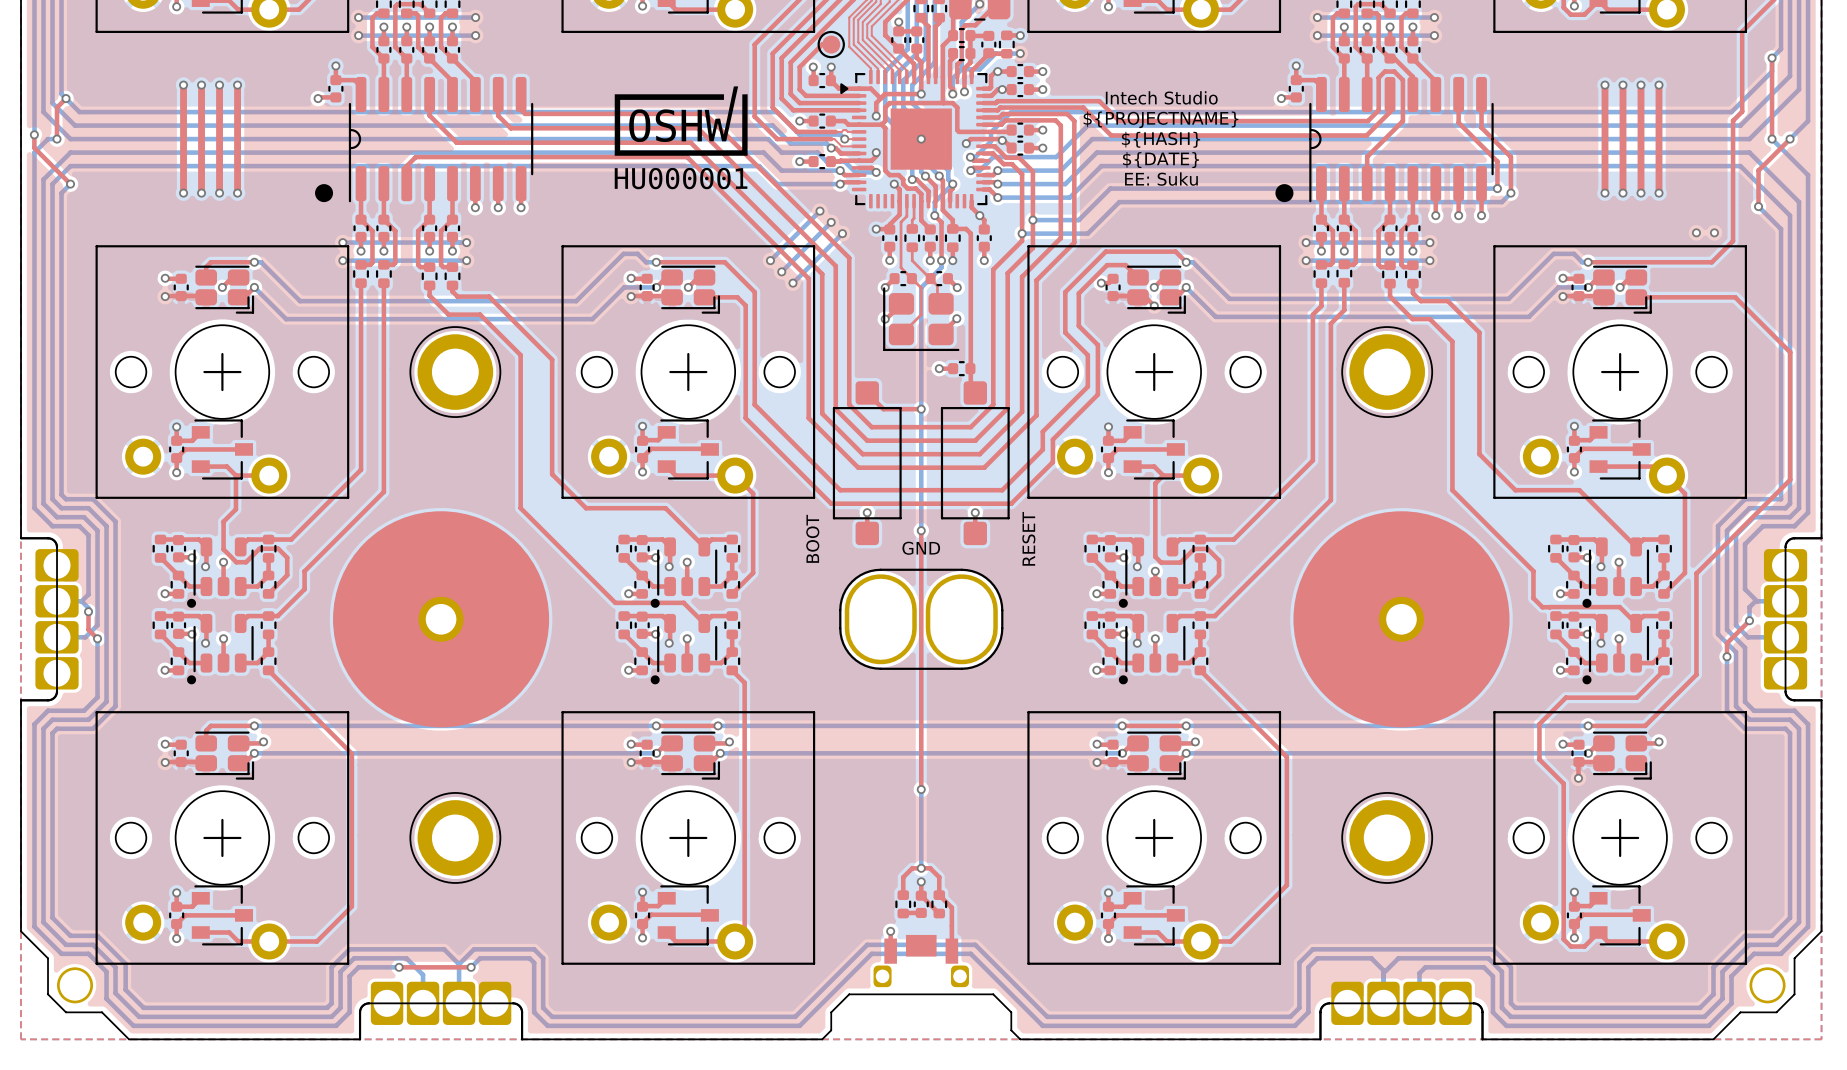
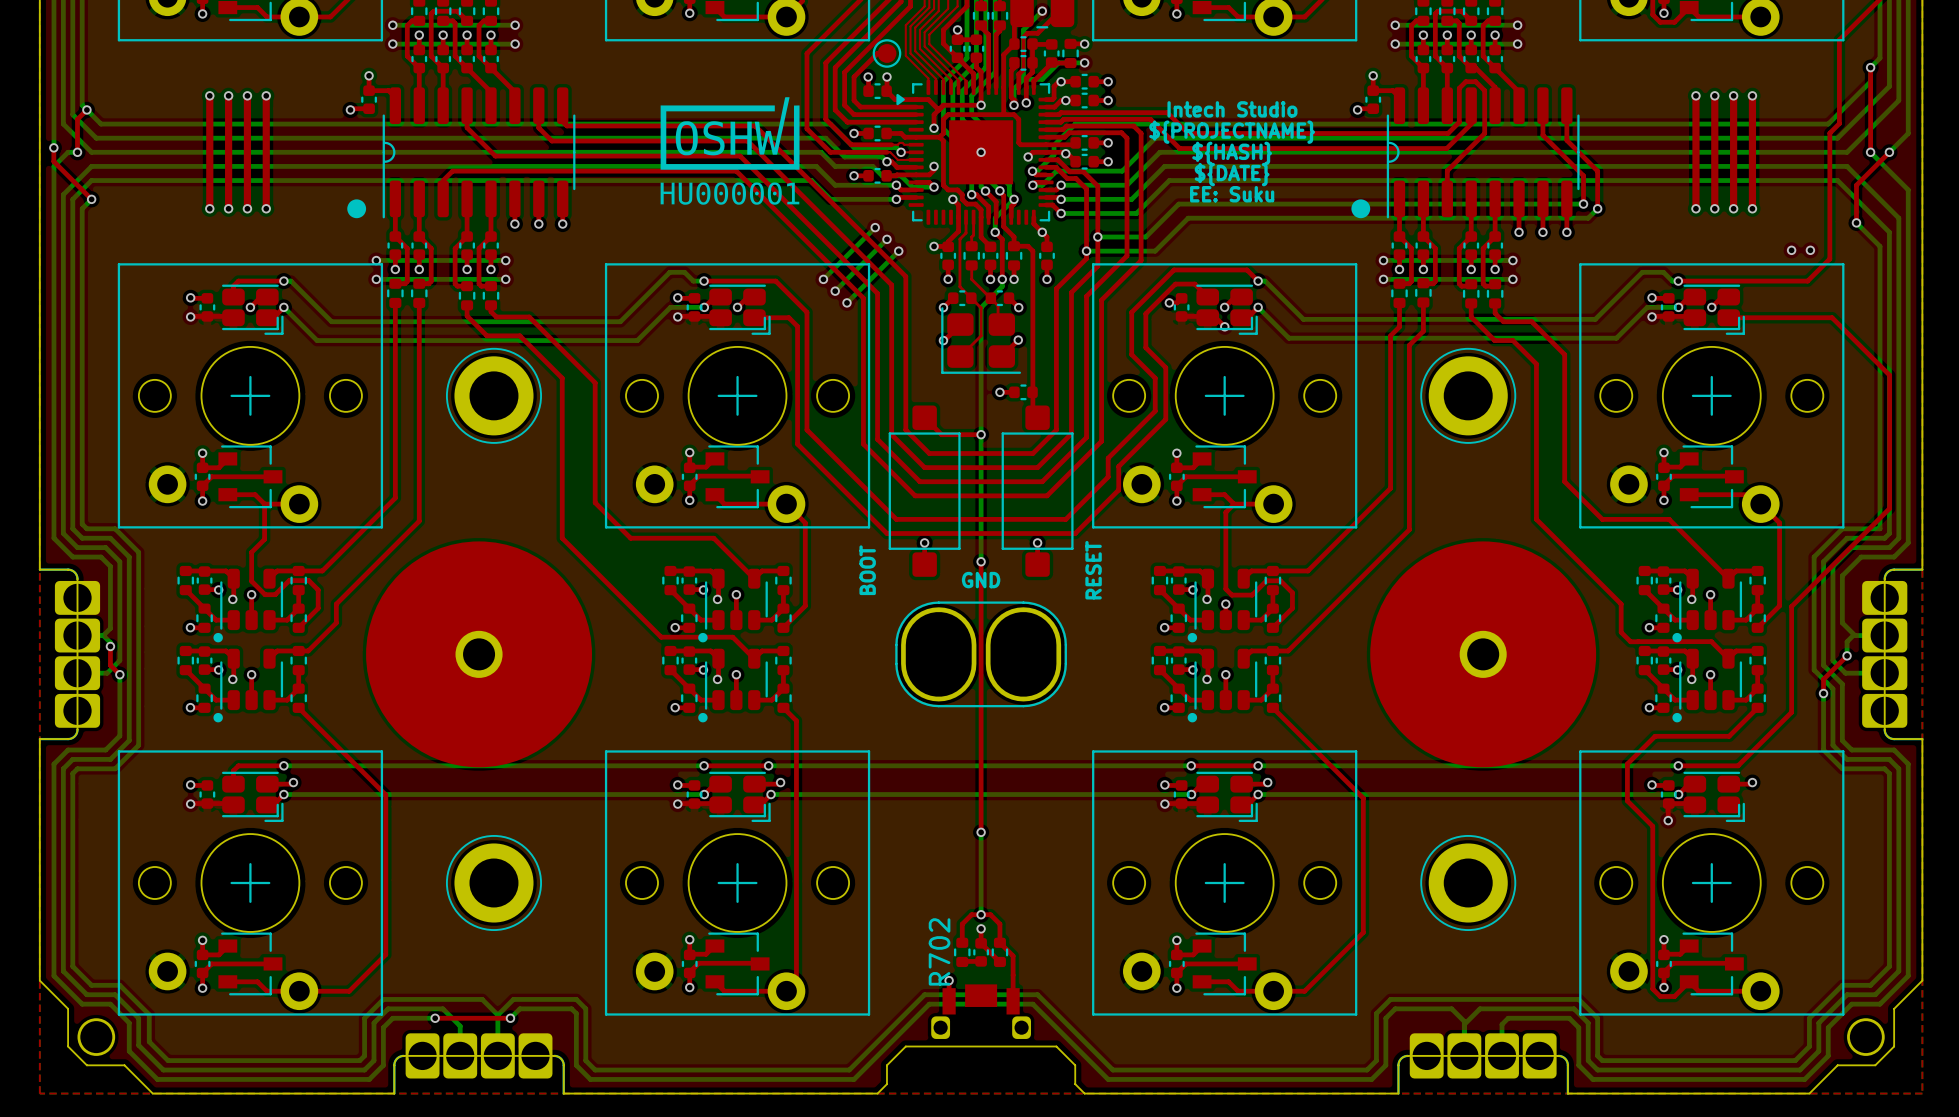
R702 name: none -> R702 (939, 951)

